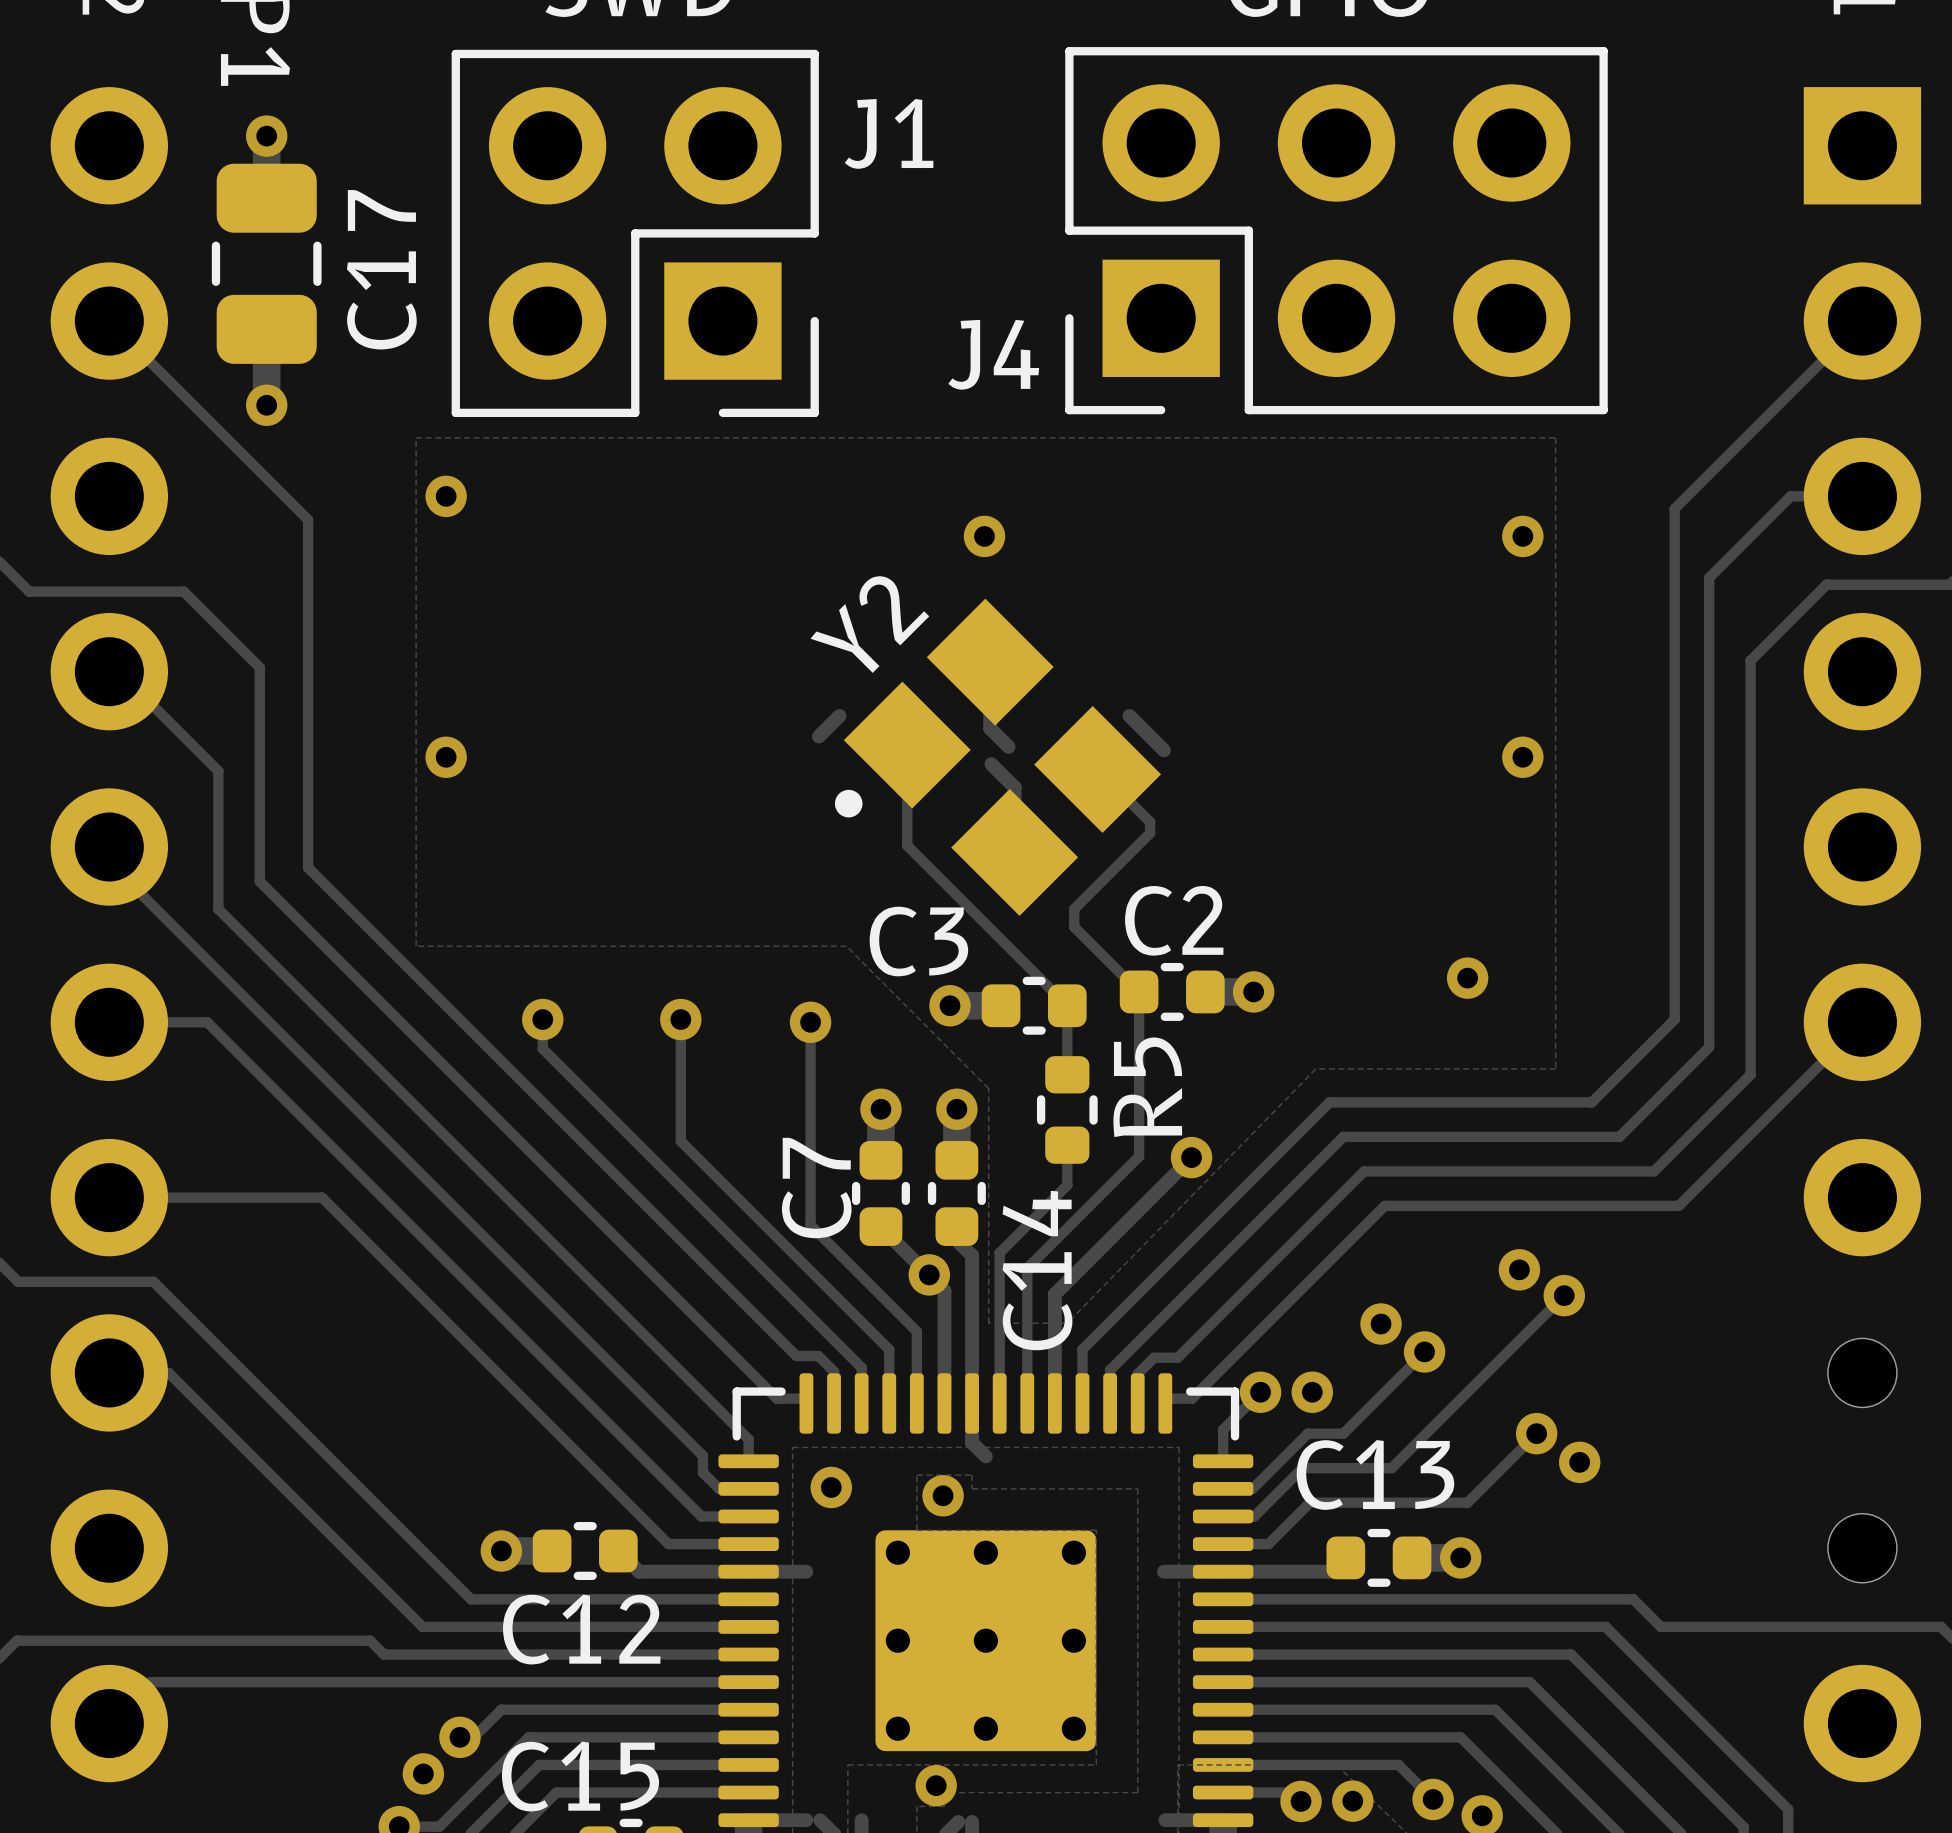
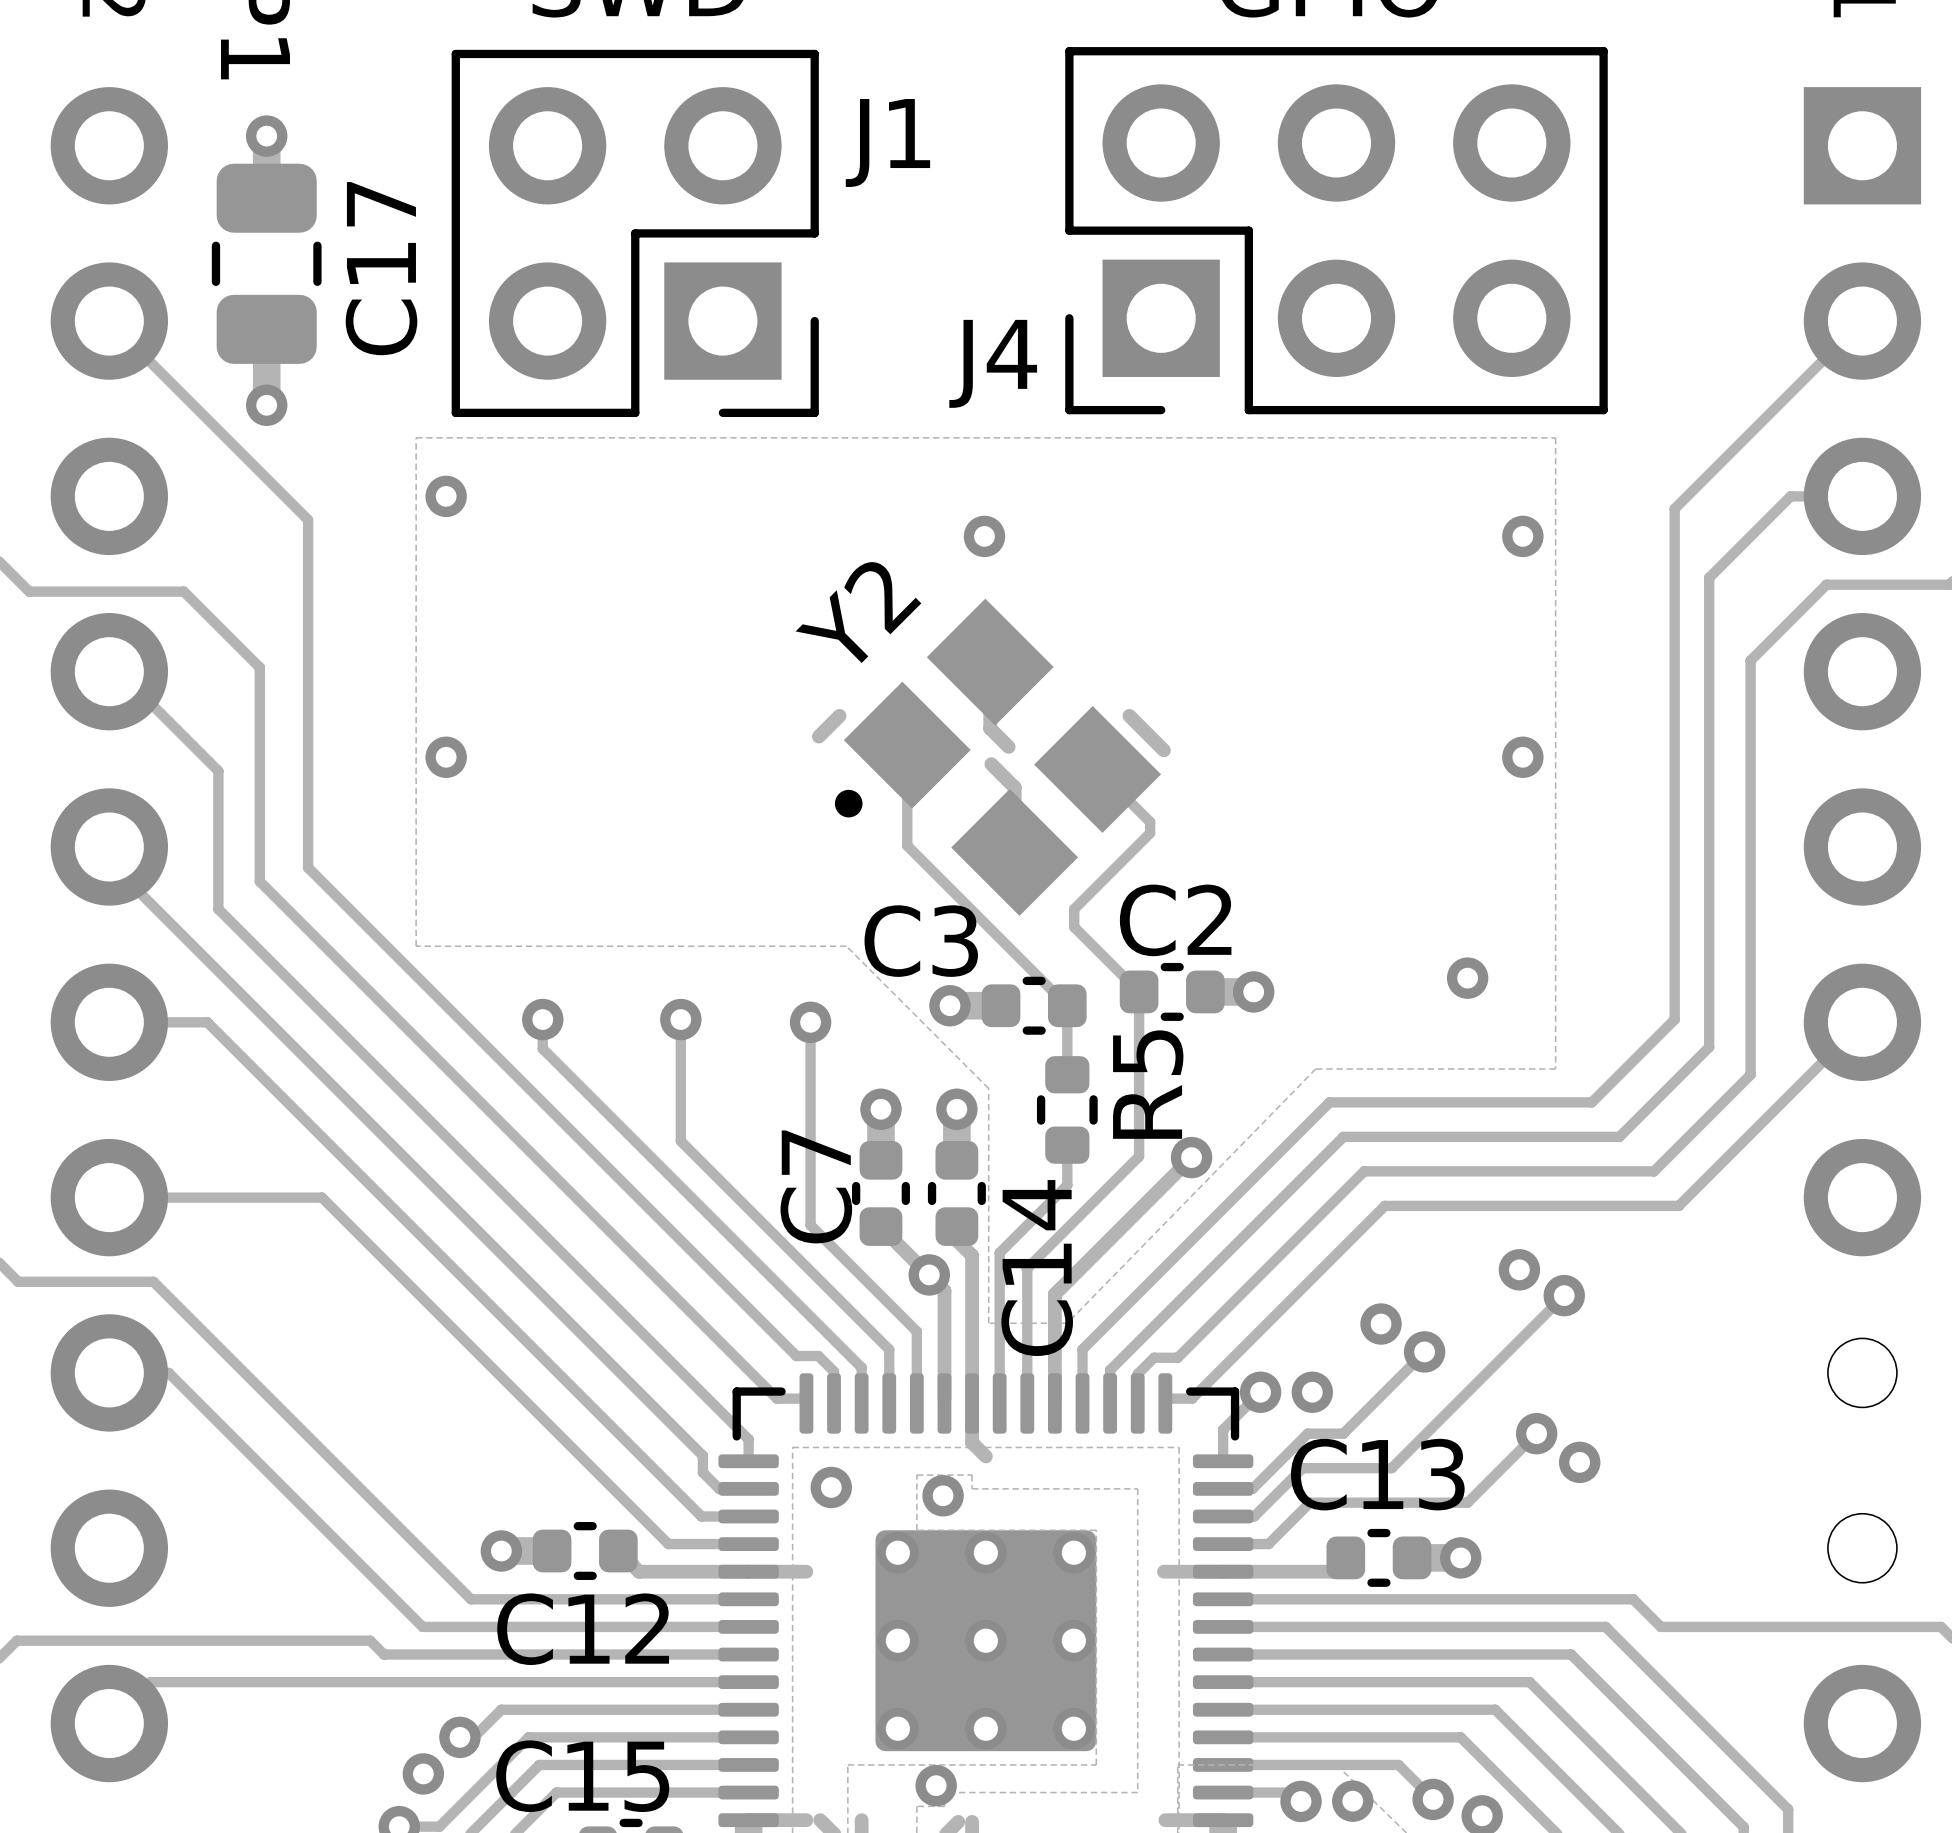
Y2 name position: Y2 (869, 624) -> Y2 (858, 612)

